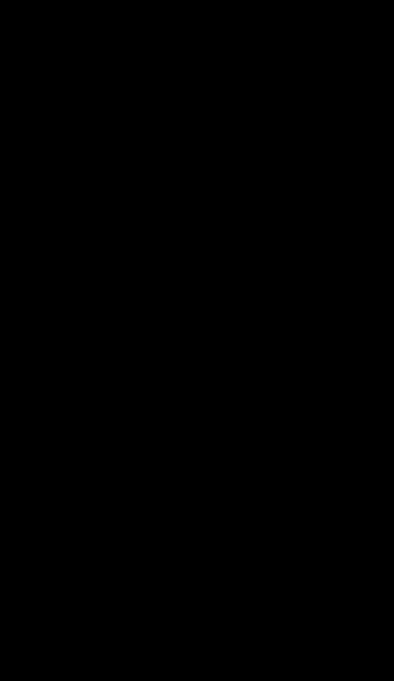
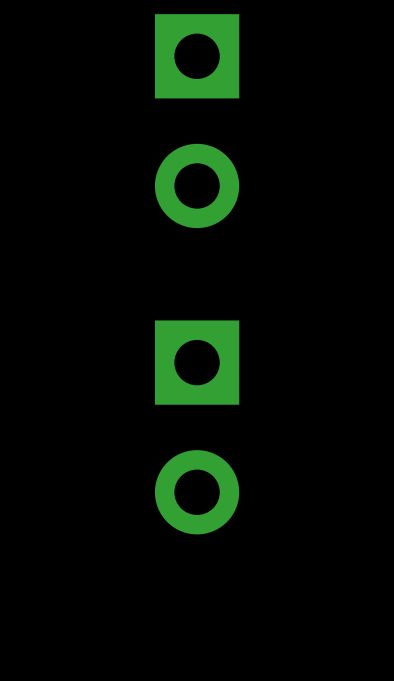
part: none -> (197, 121)
part: none -> (197, 427)

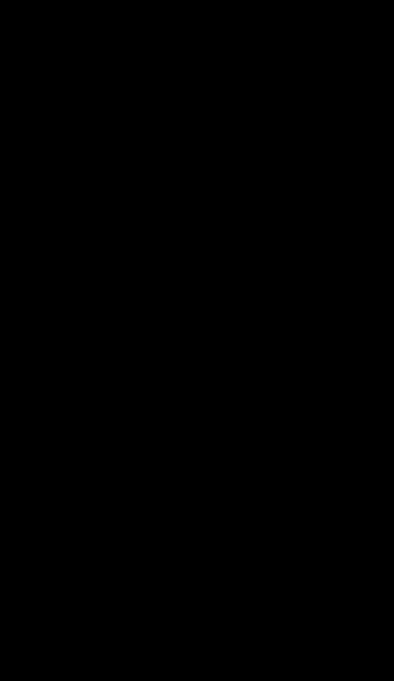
part: (197, 121) -> none
part: (197, 427) -> none

